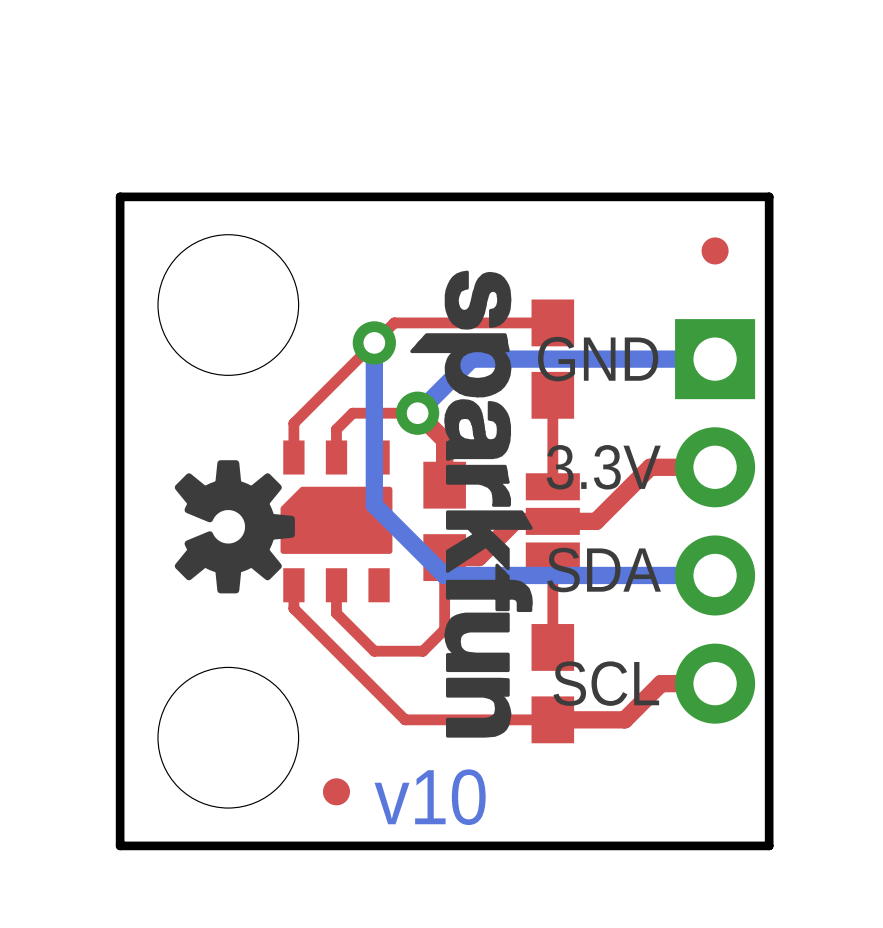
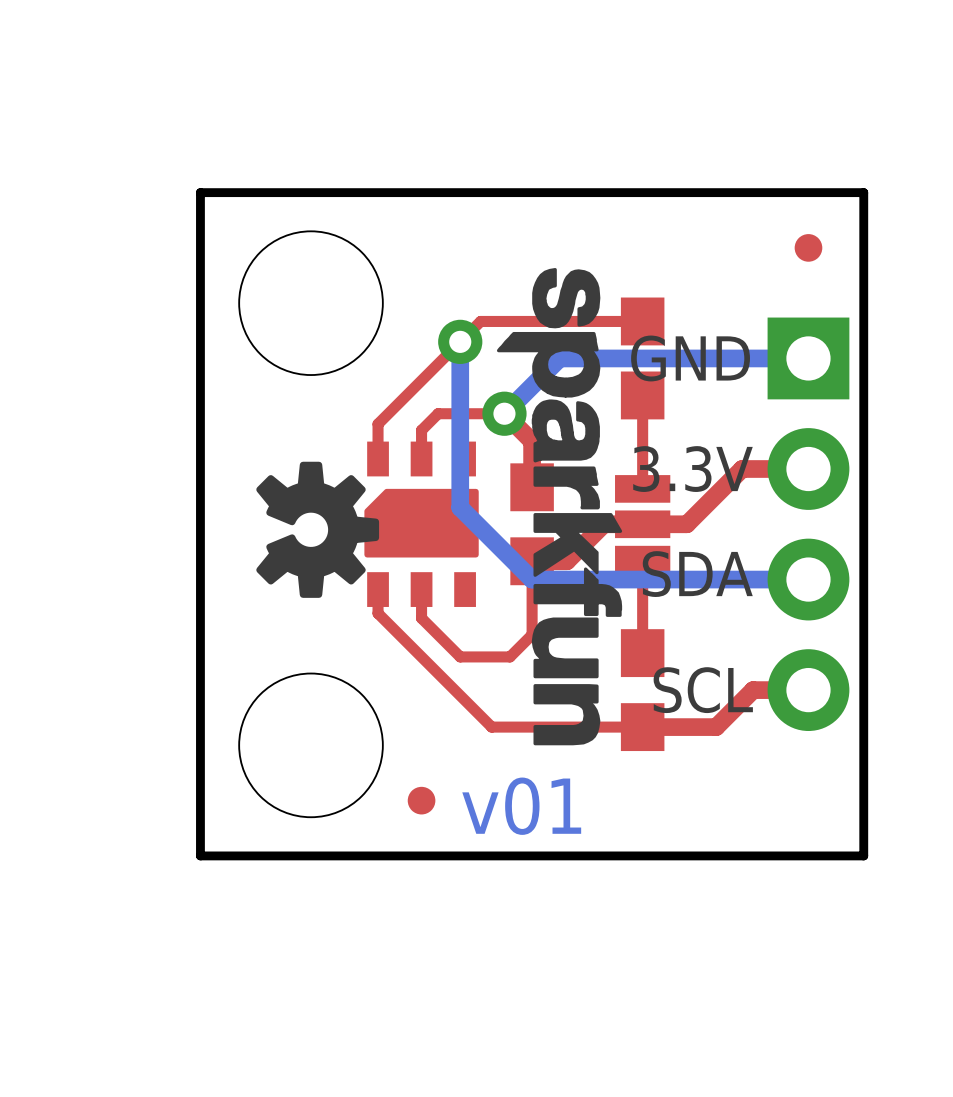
text: v10 (430, 797) -> v01 (521, 806)

